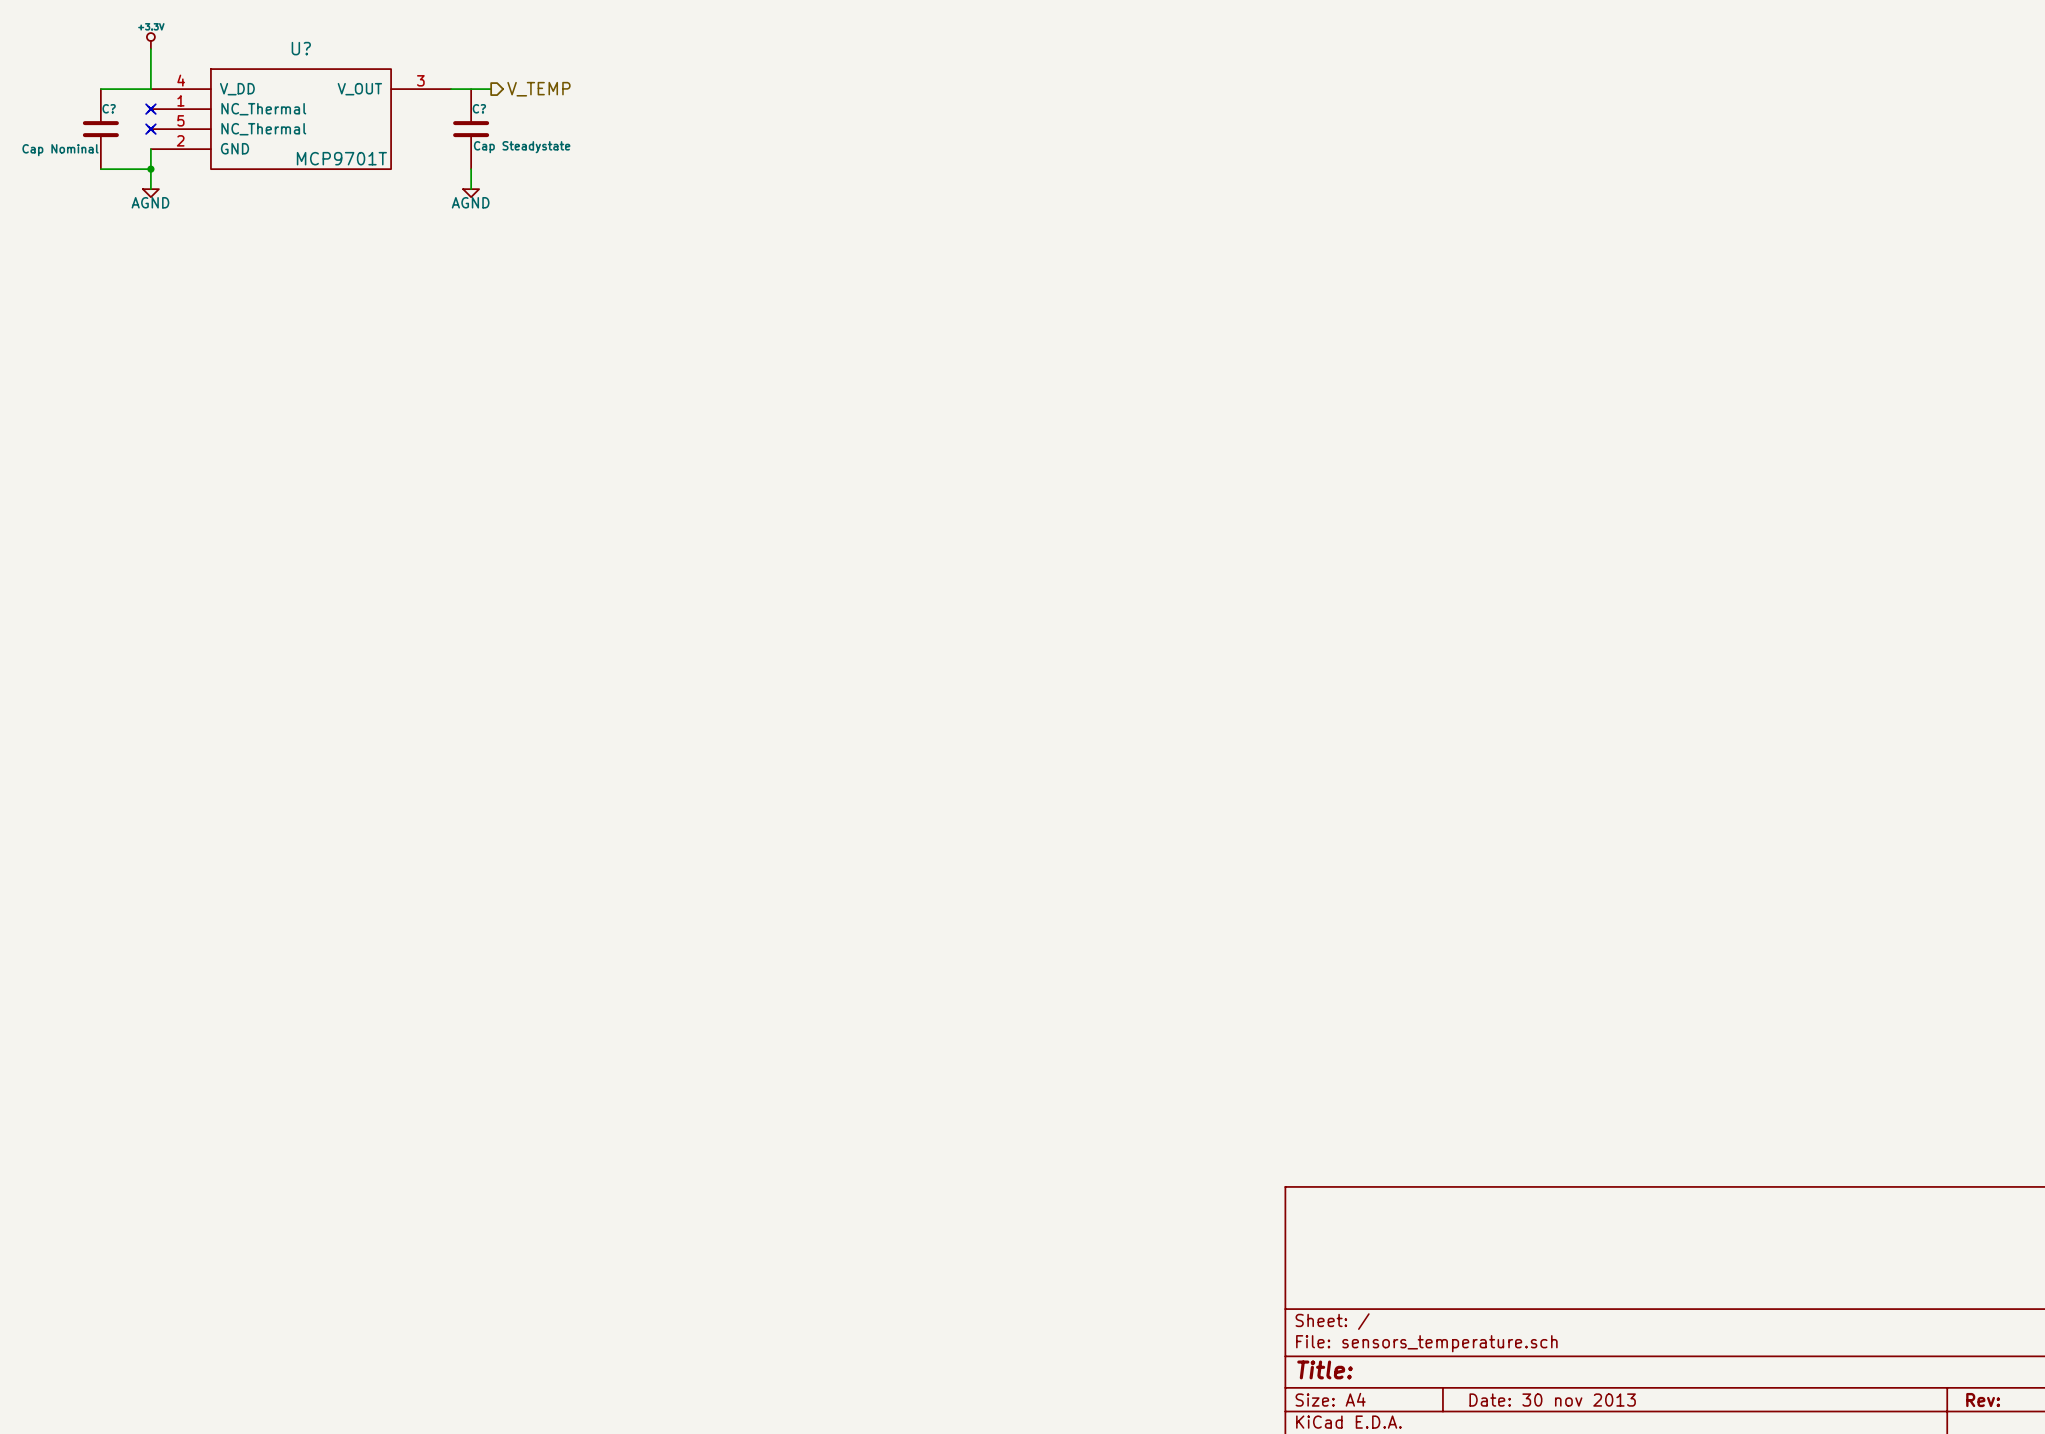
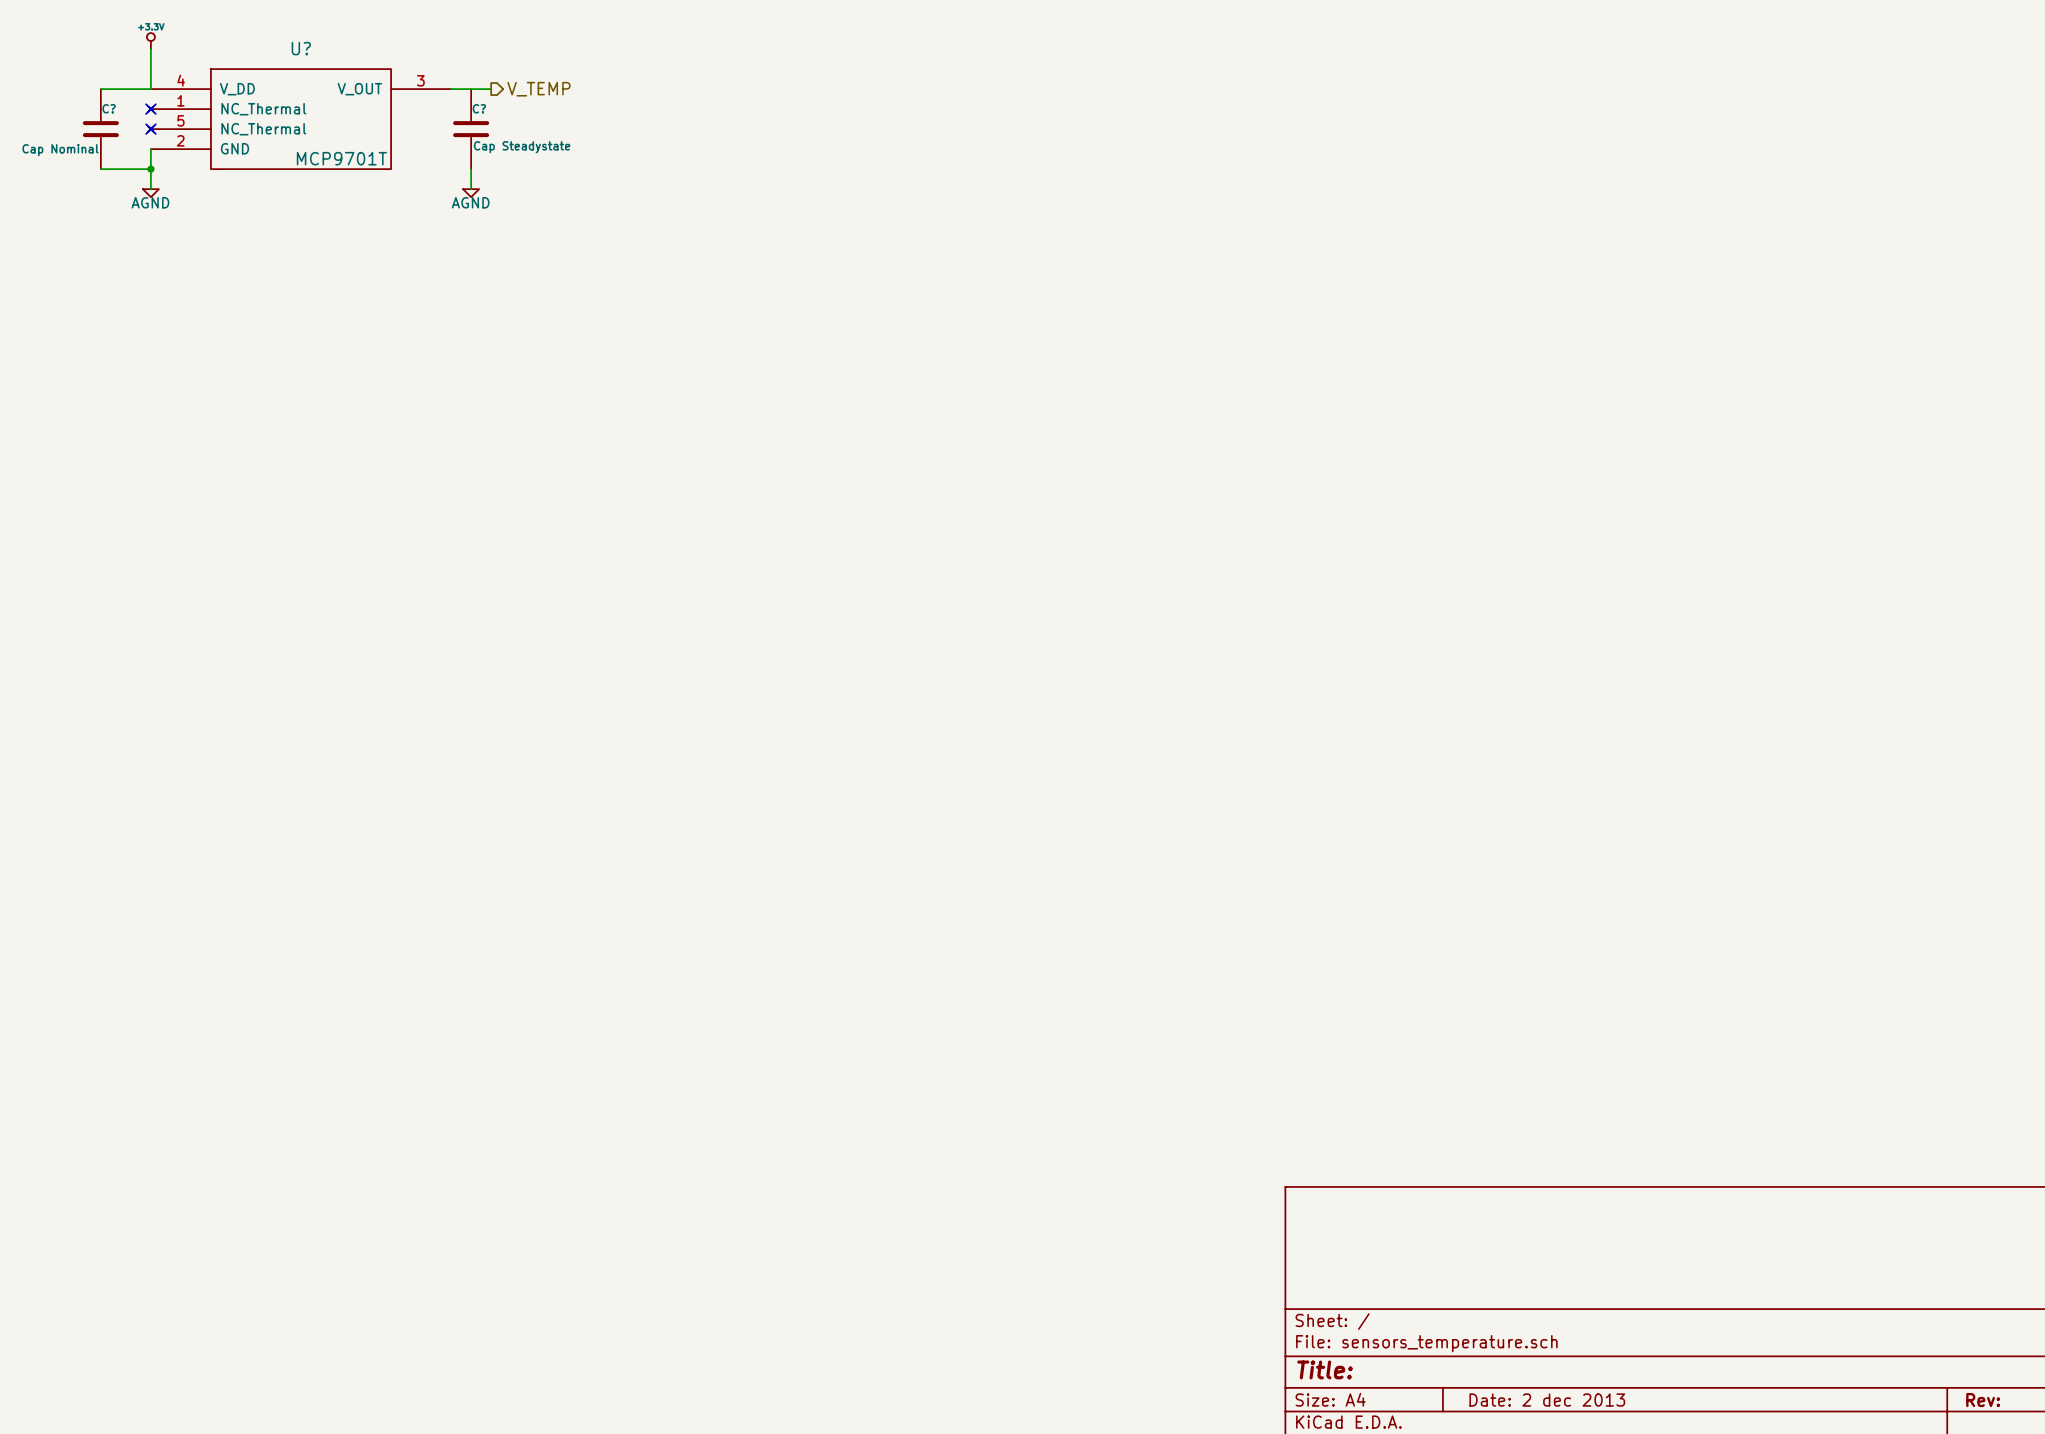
title block: Date: 30 nov 2013 (1552, 1400) -> Date: 2 dec 2013 (1547, 1400)

